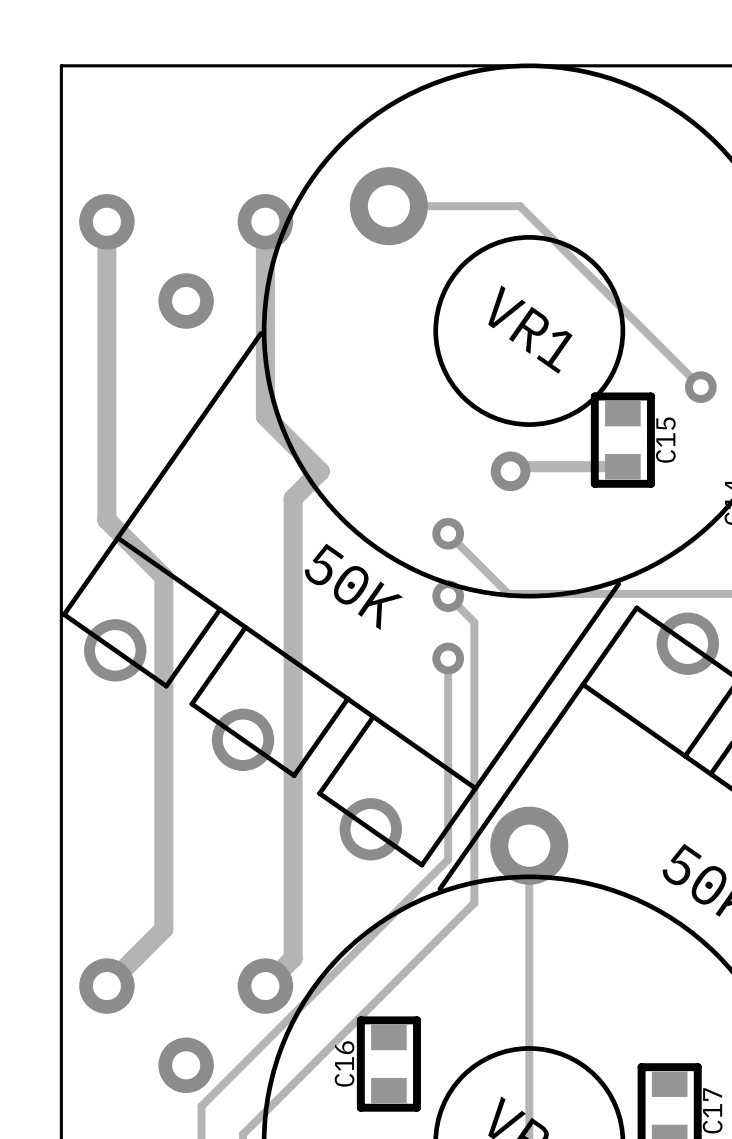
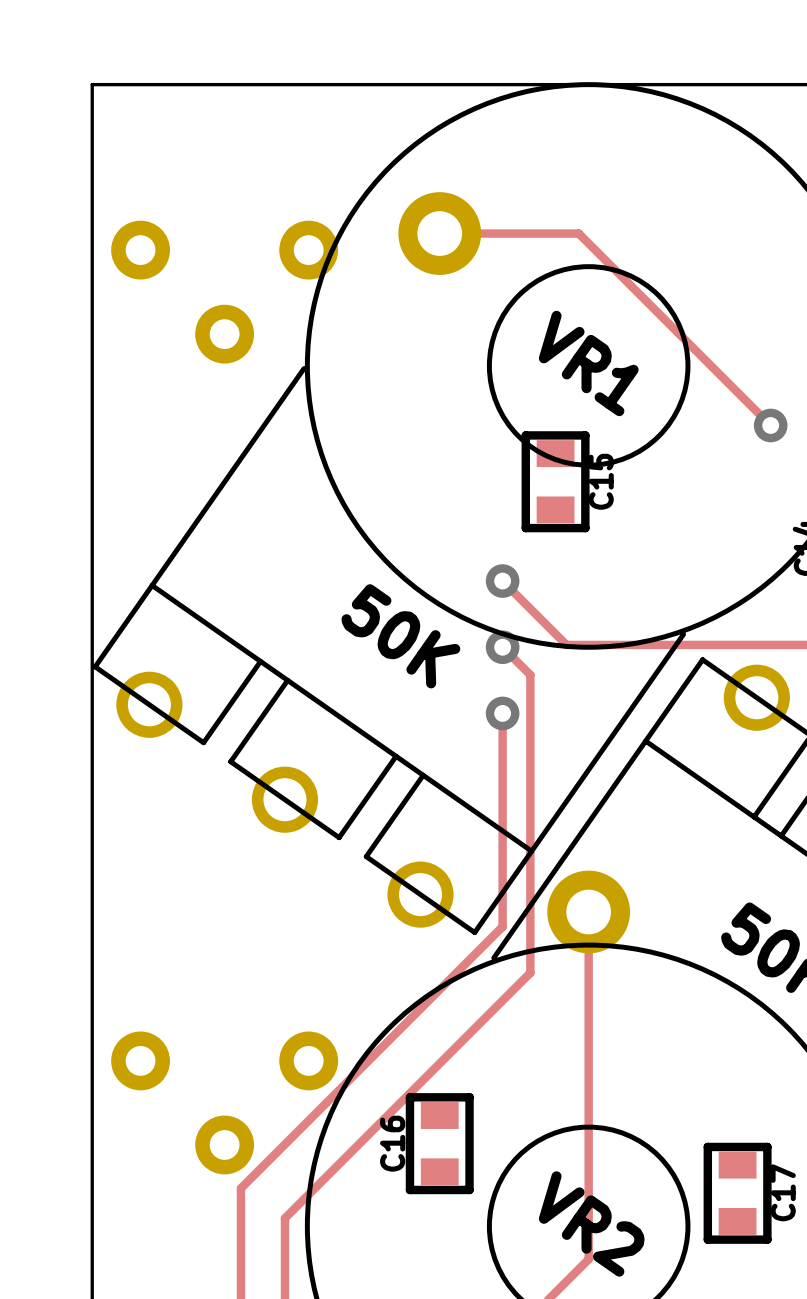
track: (106, 221) (106, 520) (163, 576) (163, 929) (106, 986) -> none
track: (265, 221) (265, 416) (320, 471) (293, 498) (293, 958) (265, 986) -> none
C15 position: (622, 440) -> (555, 481)
track: (622, 466) (515, 466) (510, 471) -> none
via: (510, 471) -> none

